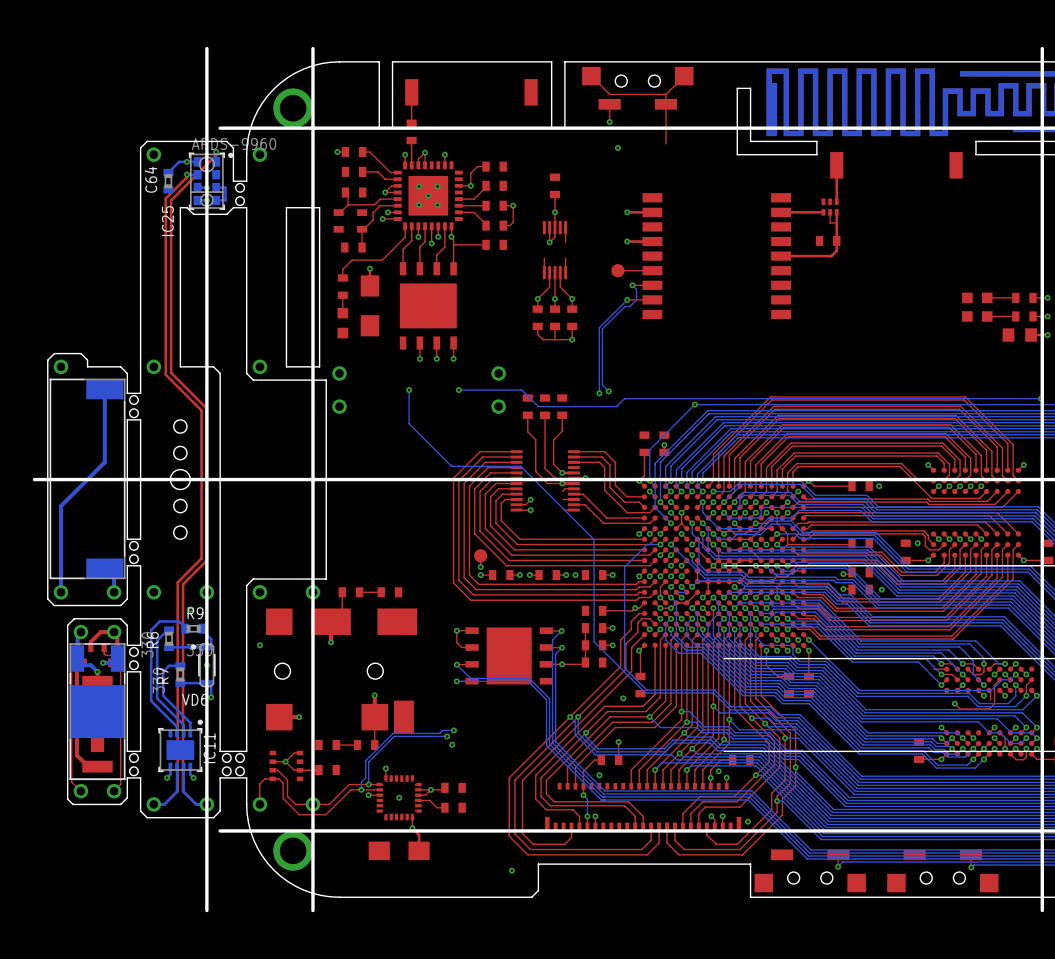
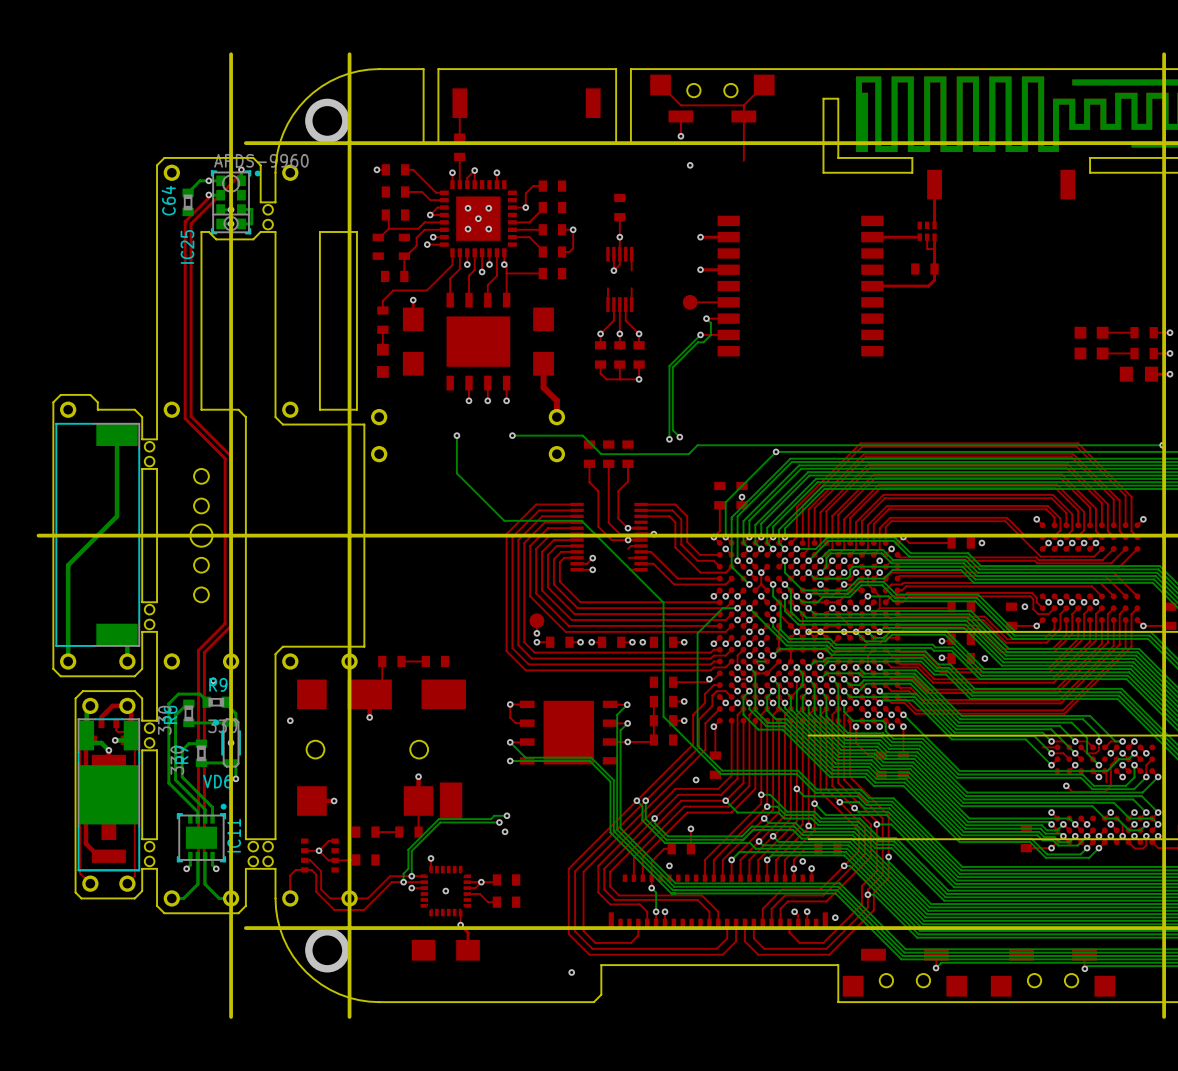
part: none -> (543, 341)
top track: none -> (543, 363) (543, 387) (556, 400) (556, 417)

